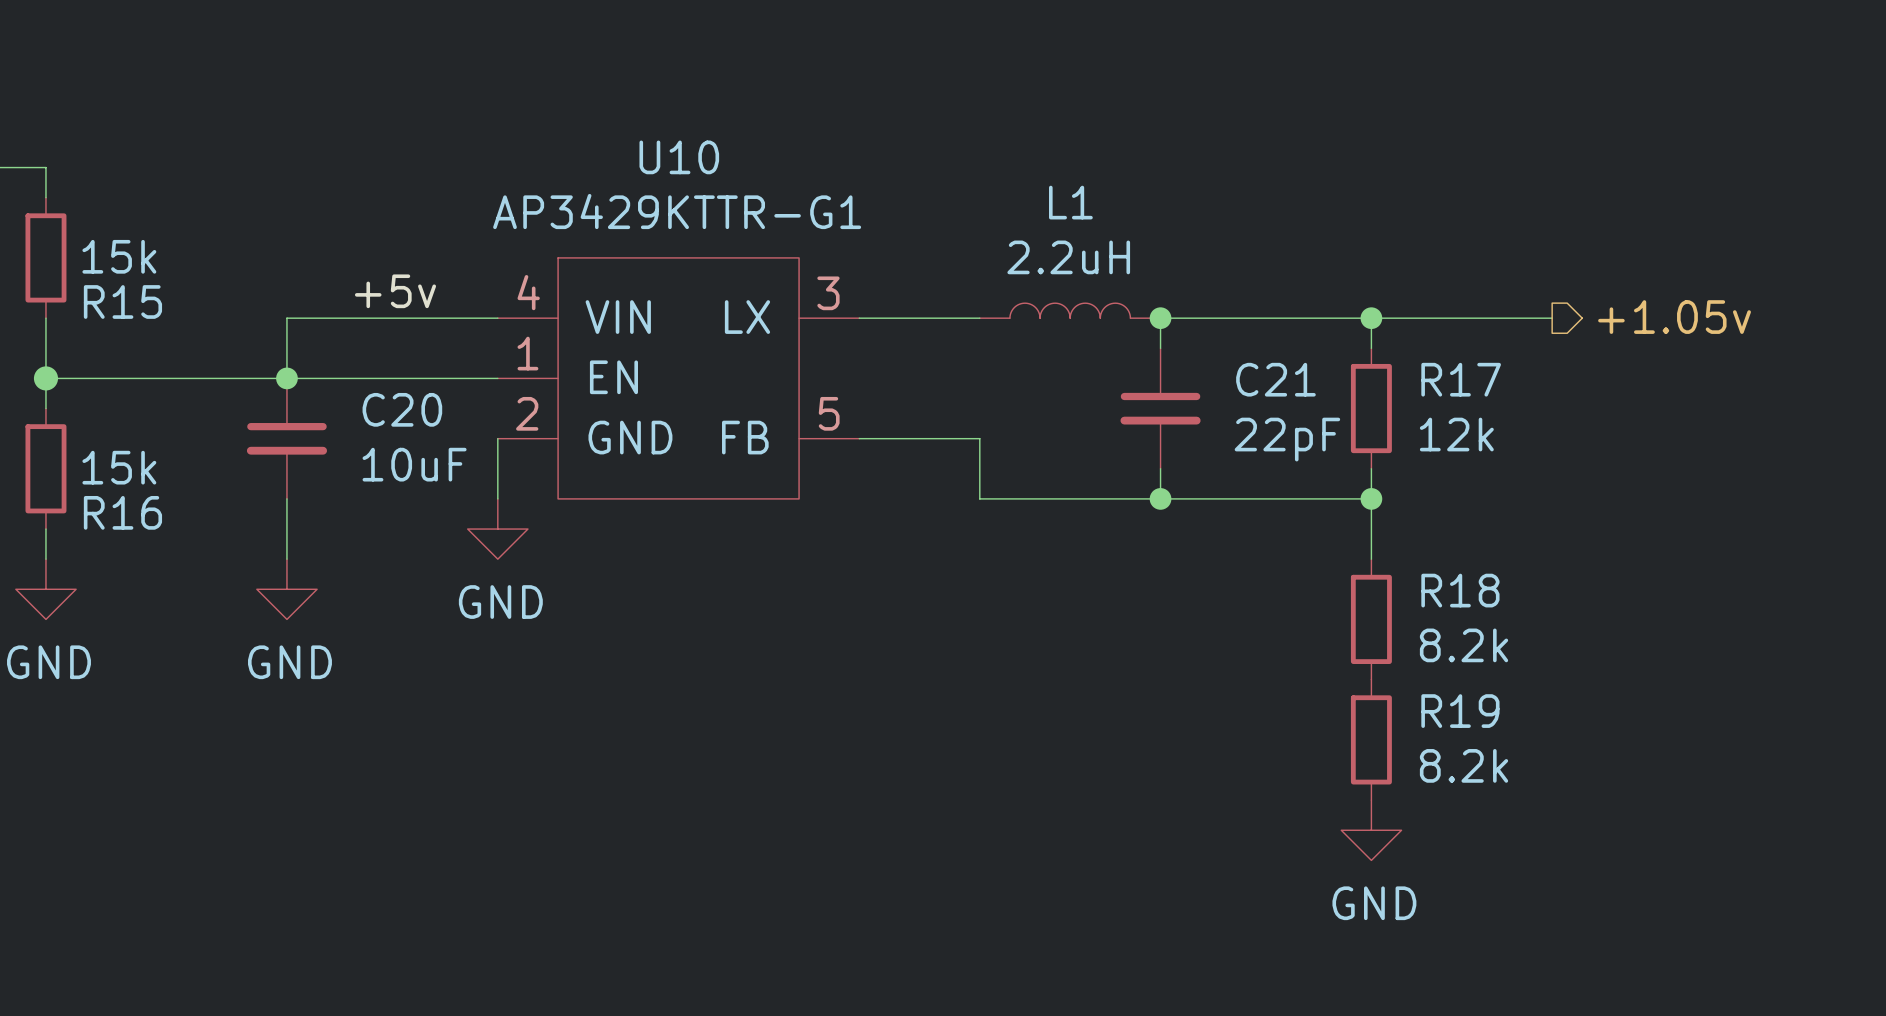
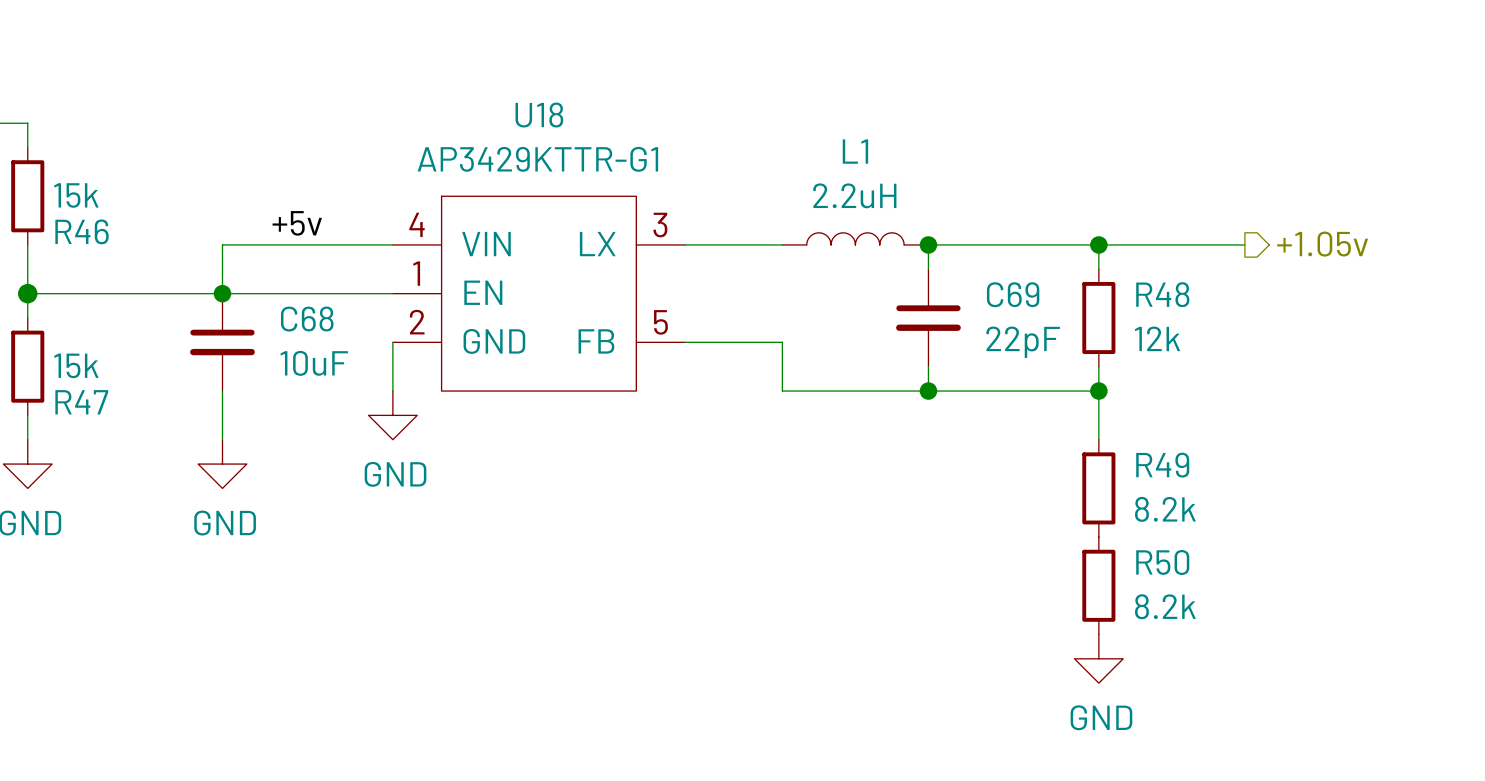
U10 name: U10 (679, 157) -> U18 (539, 115)
R15 name: R15 (122, 301) -> R46 (82, 231)
C21 name: C21 (1275, 379) -> C69 (1013, 294)
R17 name: R17 (1461, 379) -> R48 (1162, 294)
C20 name: C20 (402, 409) -> C68 (307, 319)
R16 name: R16 (122, 512) -> R47 (81, 402)
R18 name: R18 (1460, 590) -> R49 (1162, 465)
R19 name: R19 (1460, 711) -> R50 (1162, 562)

